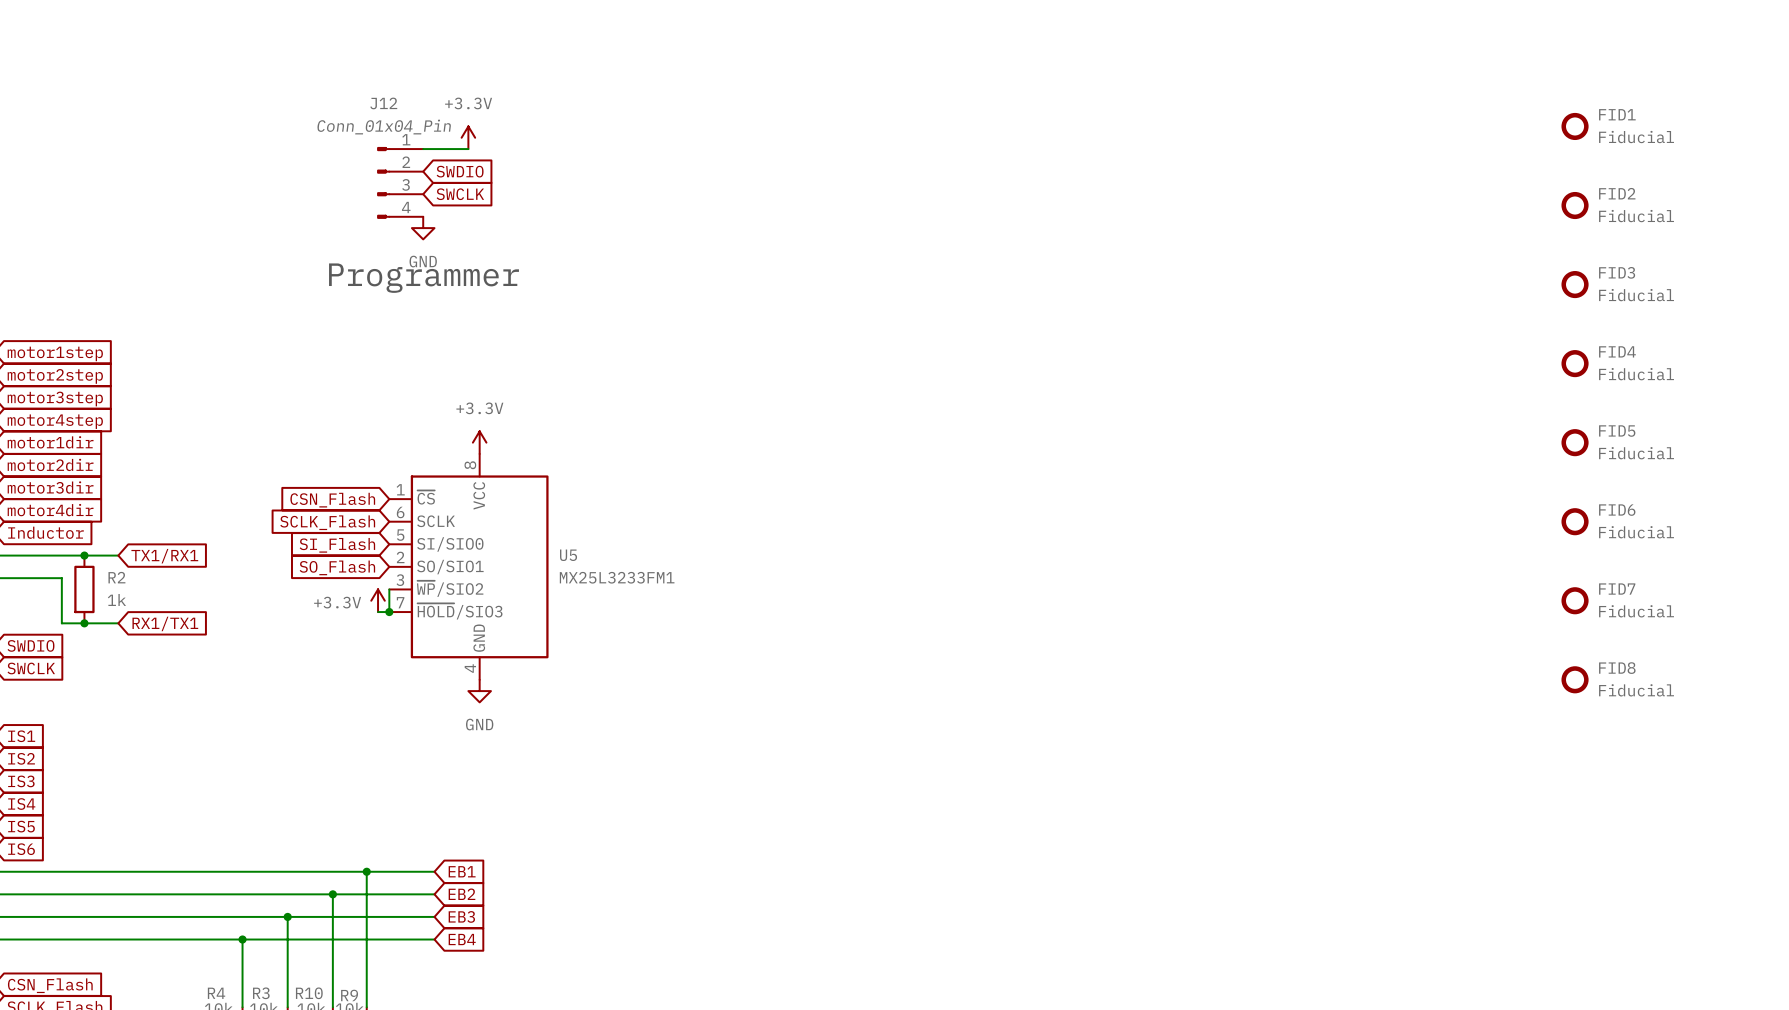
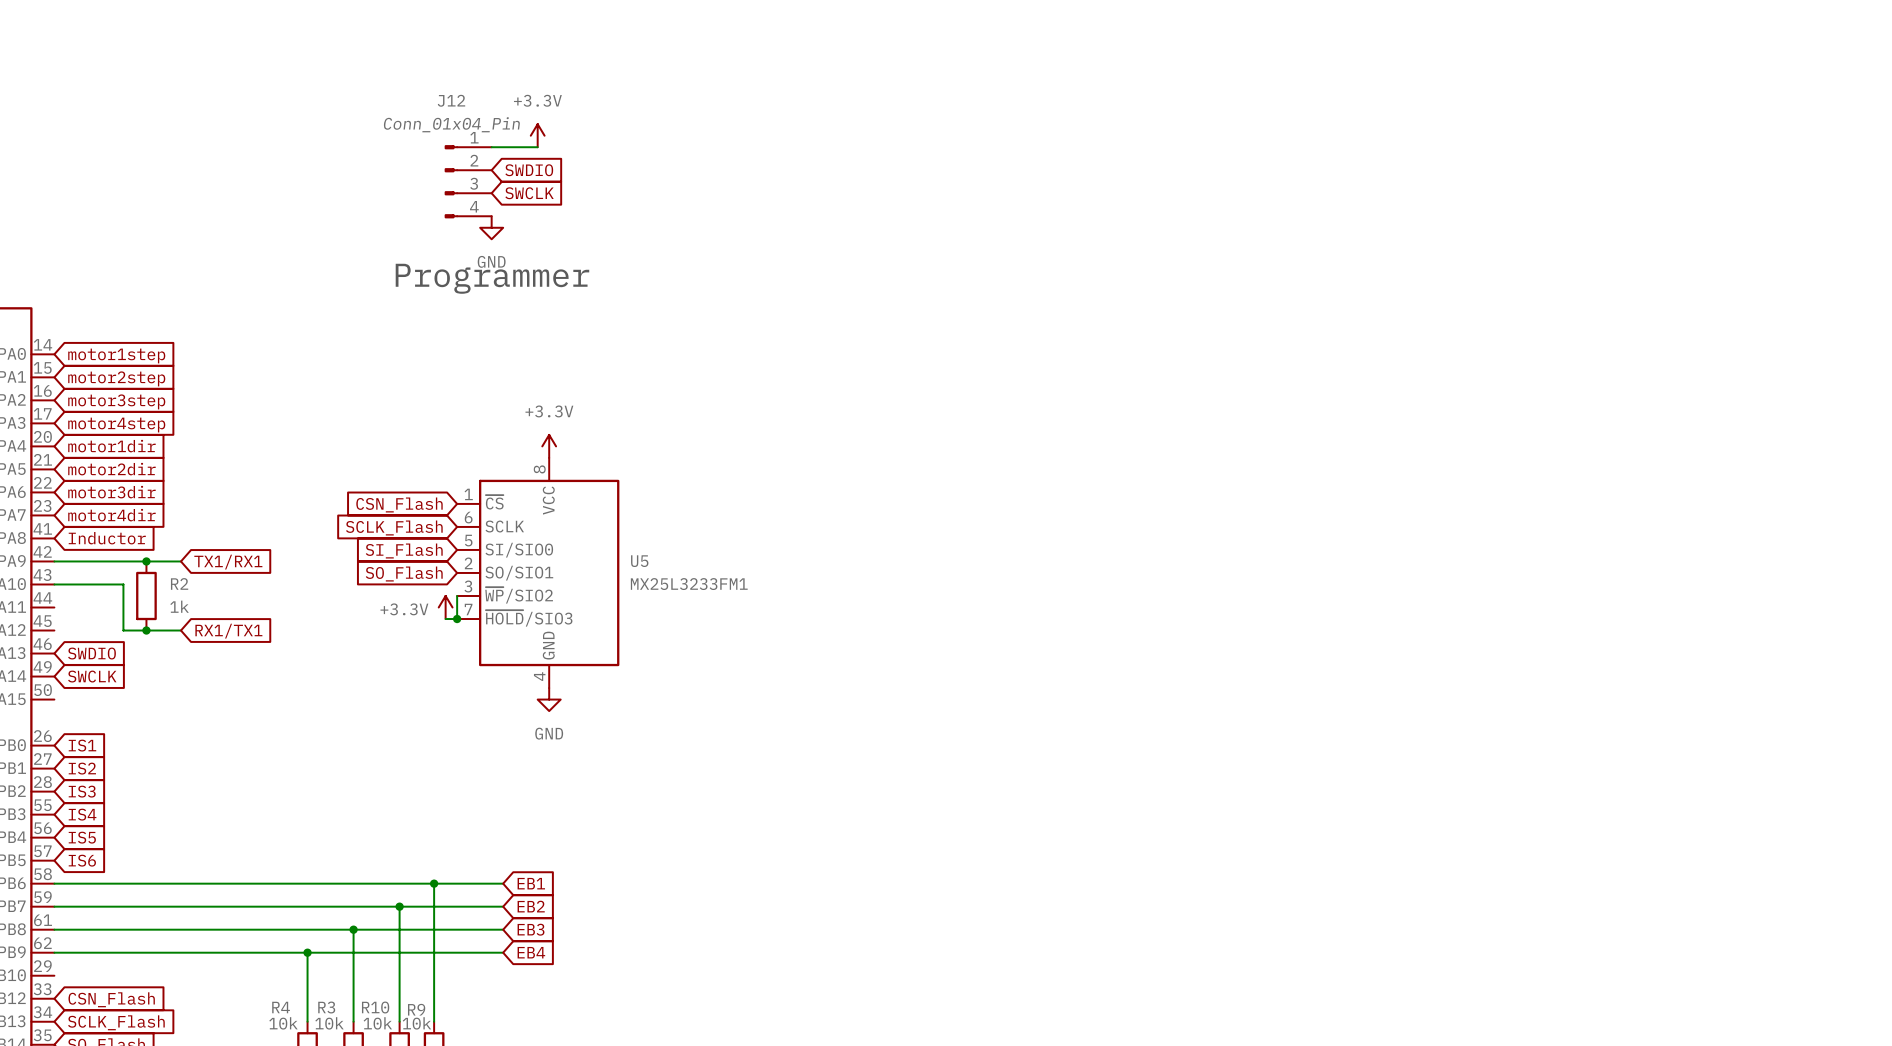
FID1: Fiducial (1575, 126) -> none
FID2: Fiducial (1575, 205) -> none
FID3: Fiducial (1575, 284) -> none
FID4: Fiducial (1575, 363) -> none
FID5: Fiducial (1575, 442) -> none
FID6: Fiducial (1575, 521) -> none
FID7: Fiducial (1575, 600) -> none
FID8: Fiducial (1575, 679) -> none

